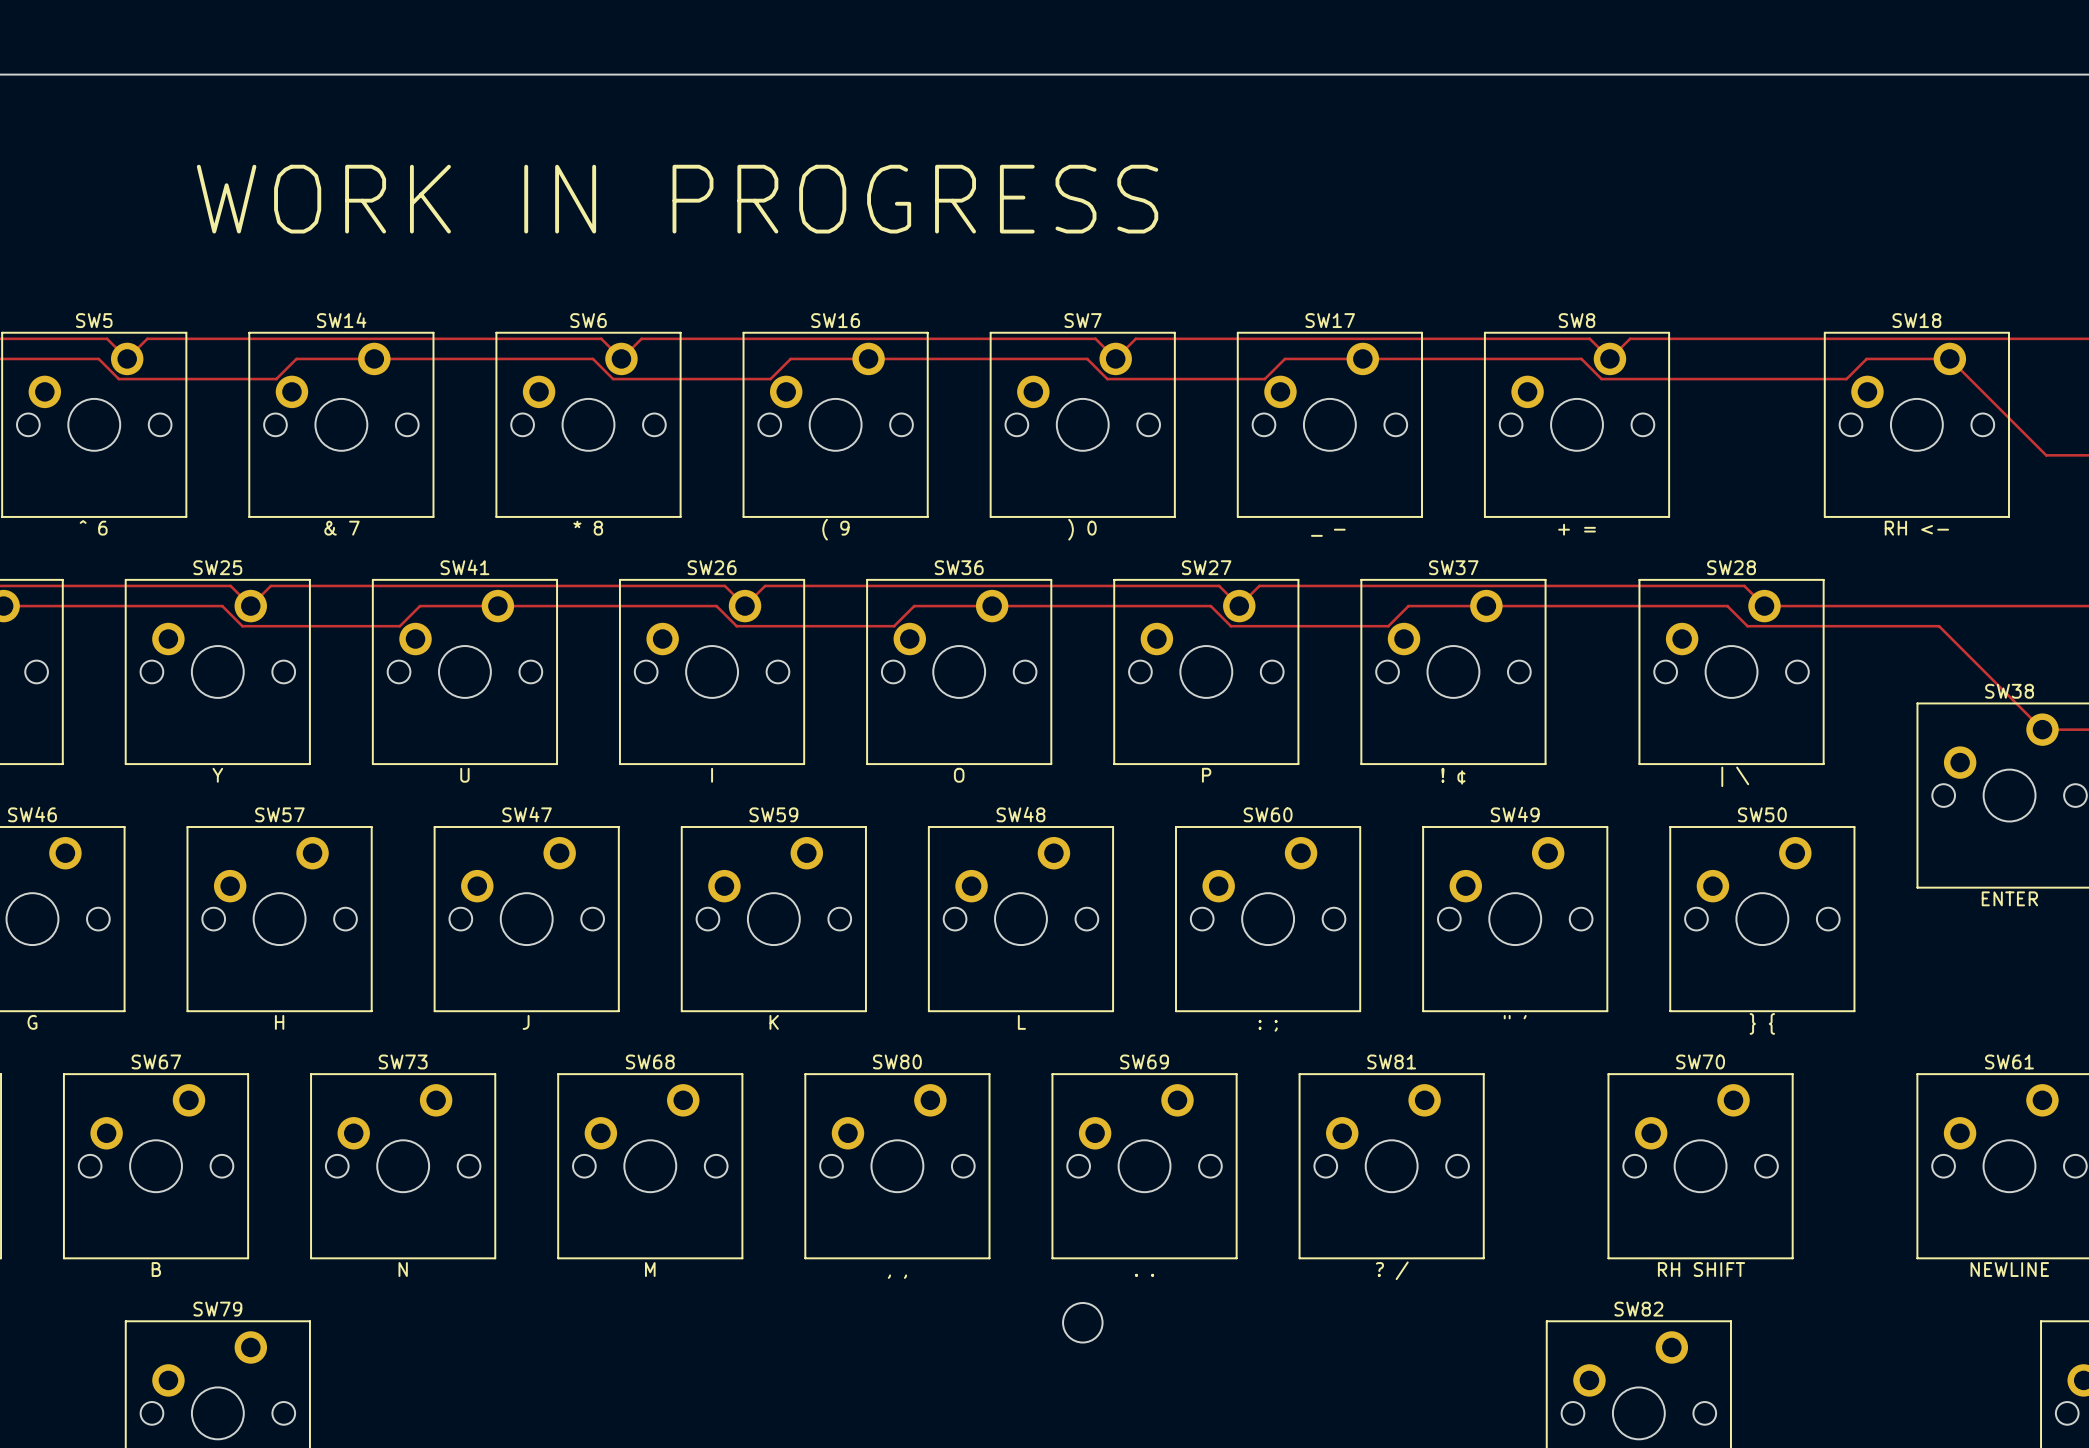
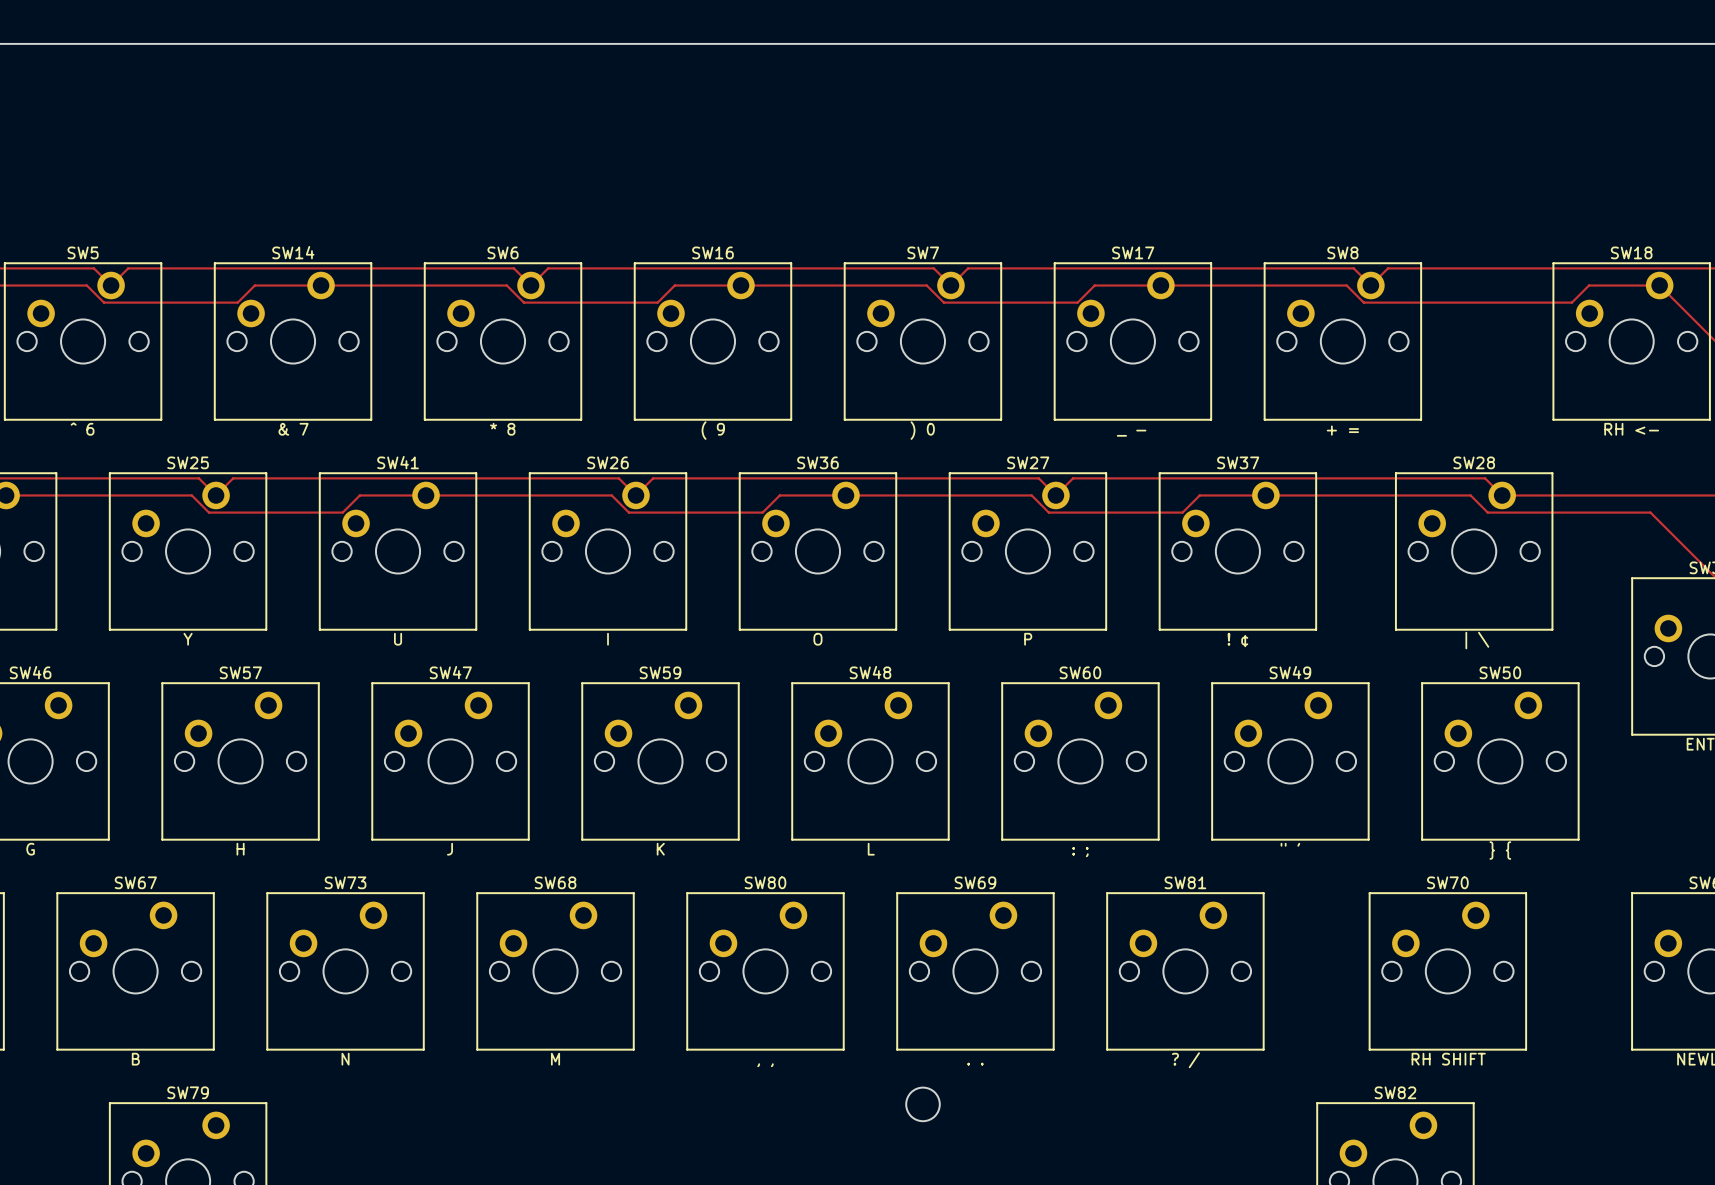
text: WORK IN PROGRESS (677, 199) -> none

